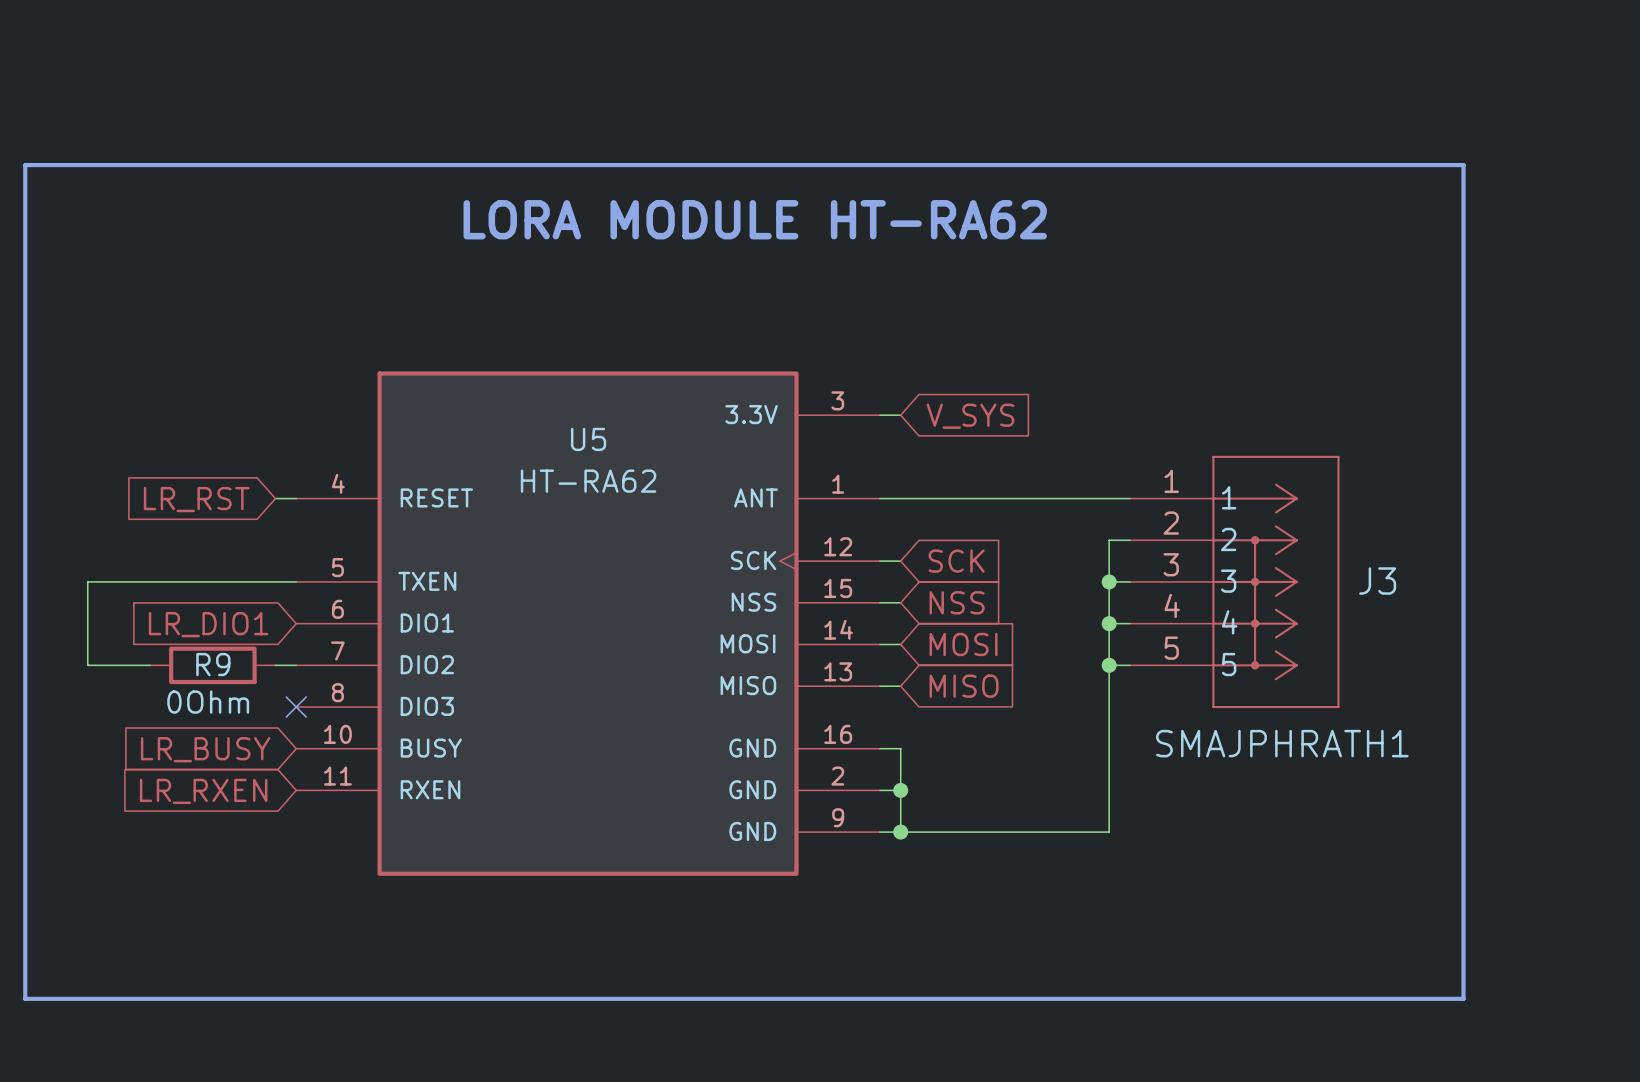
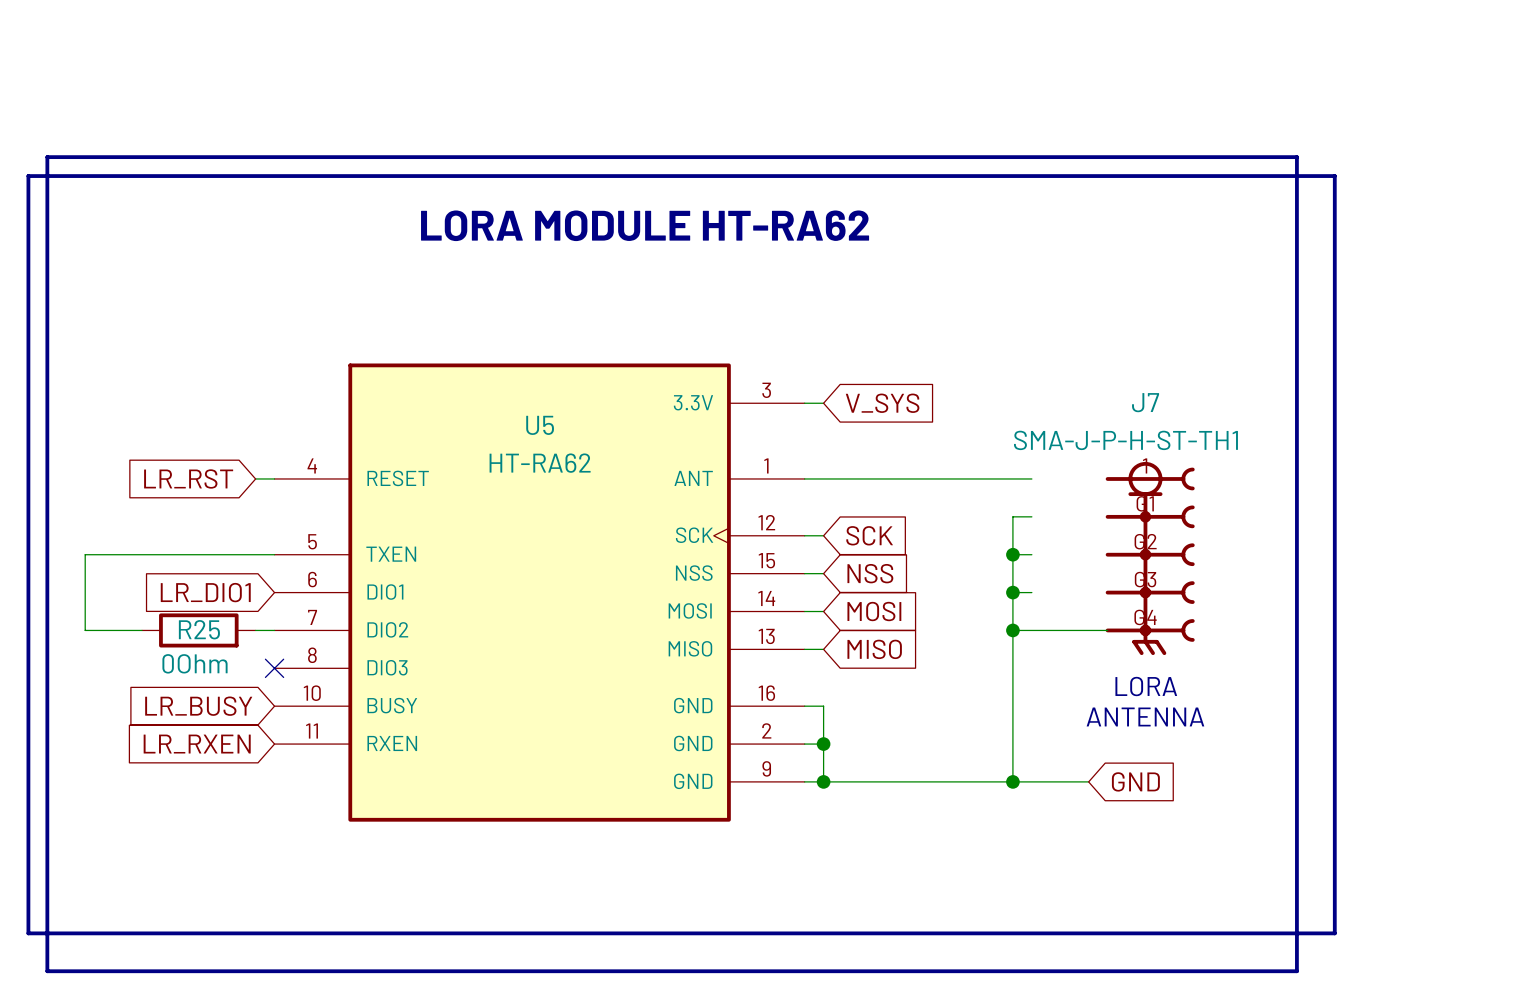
line: none -> (47, 157) (1296, 157) (1296, 971) (47, 971) (47, 157)
J3: SMAJPHRATH1 (1234, 581) -> none
J7: none -> SMA-J-P-H-ST-TH1 (1150, 558)
R9 name: R9 (213, 664) -> R25 (199, 629)
text: none -> LORA (1146, 686)
text: none -> ANTENNA (1145, 716)
wire: none -> (1012, 781) (1088, 781)
junction: none -> (1012, 781)
global label: none -> GND (1135, 781)

